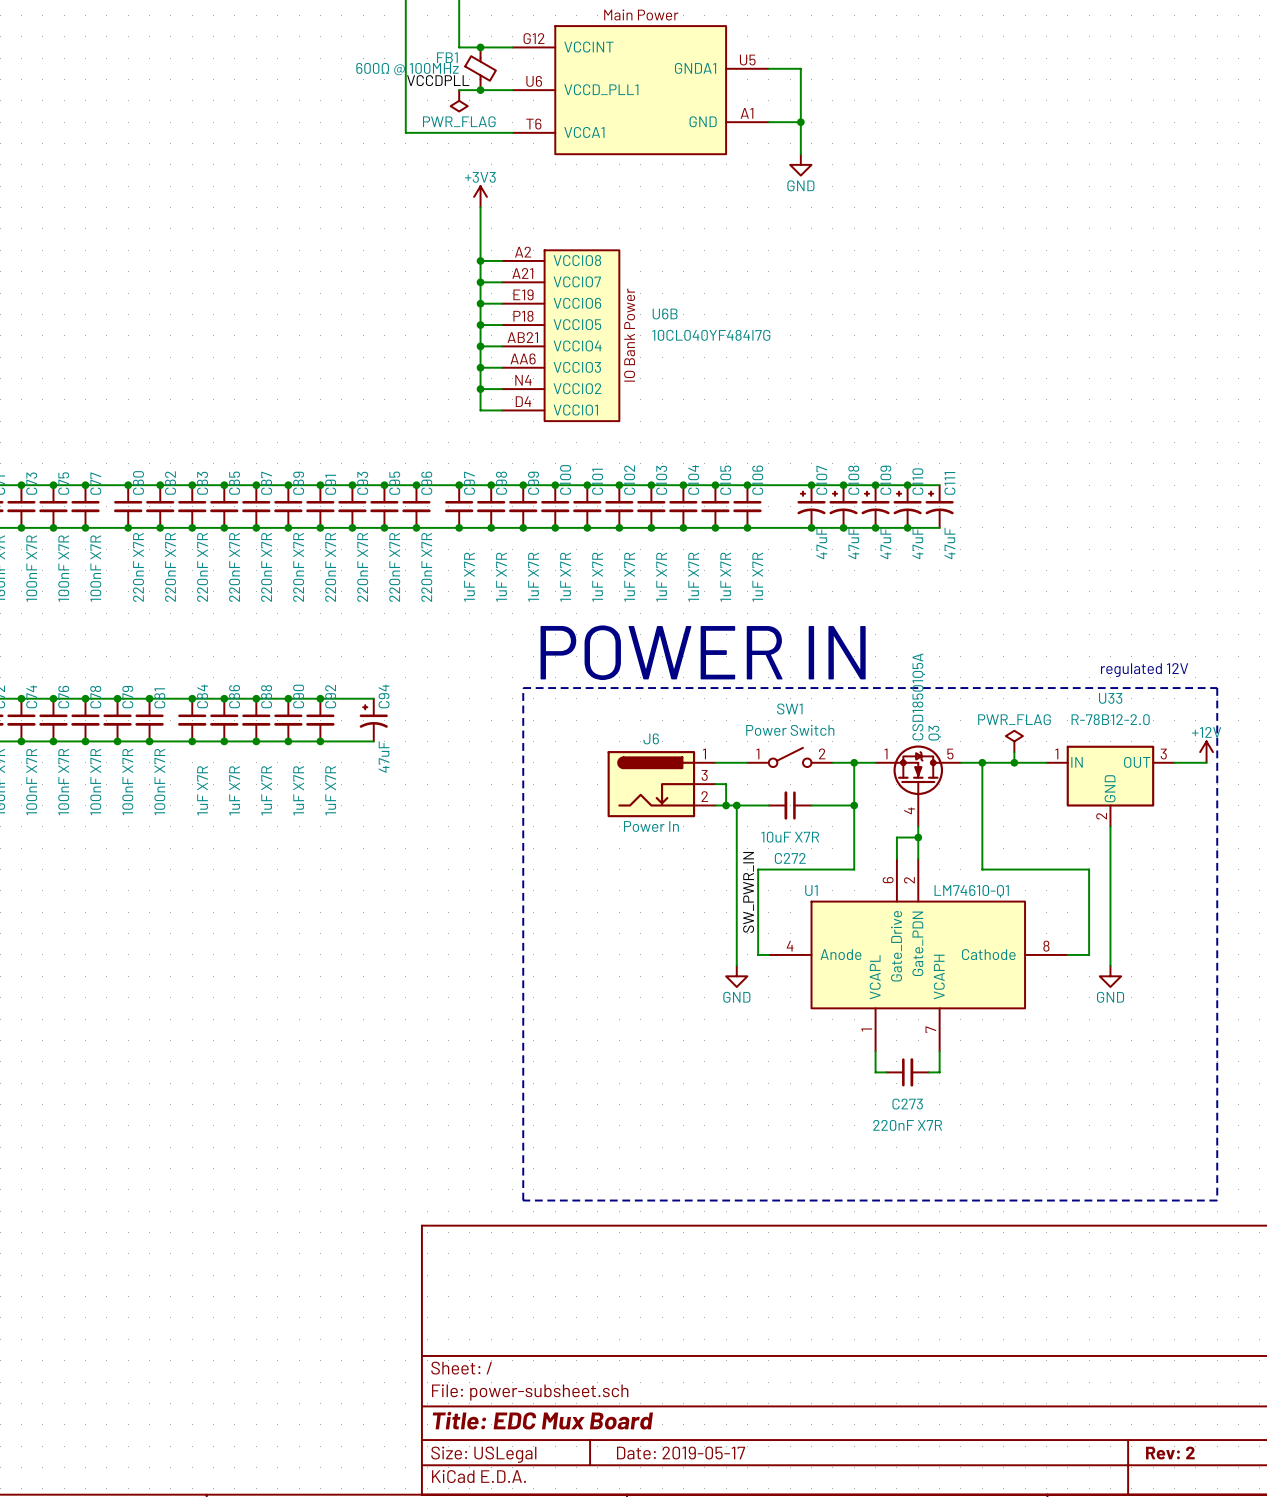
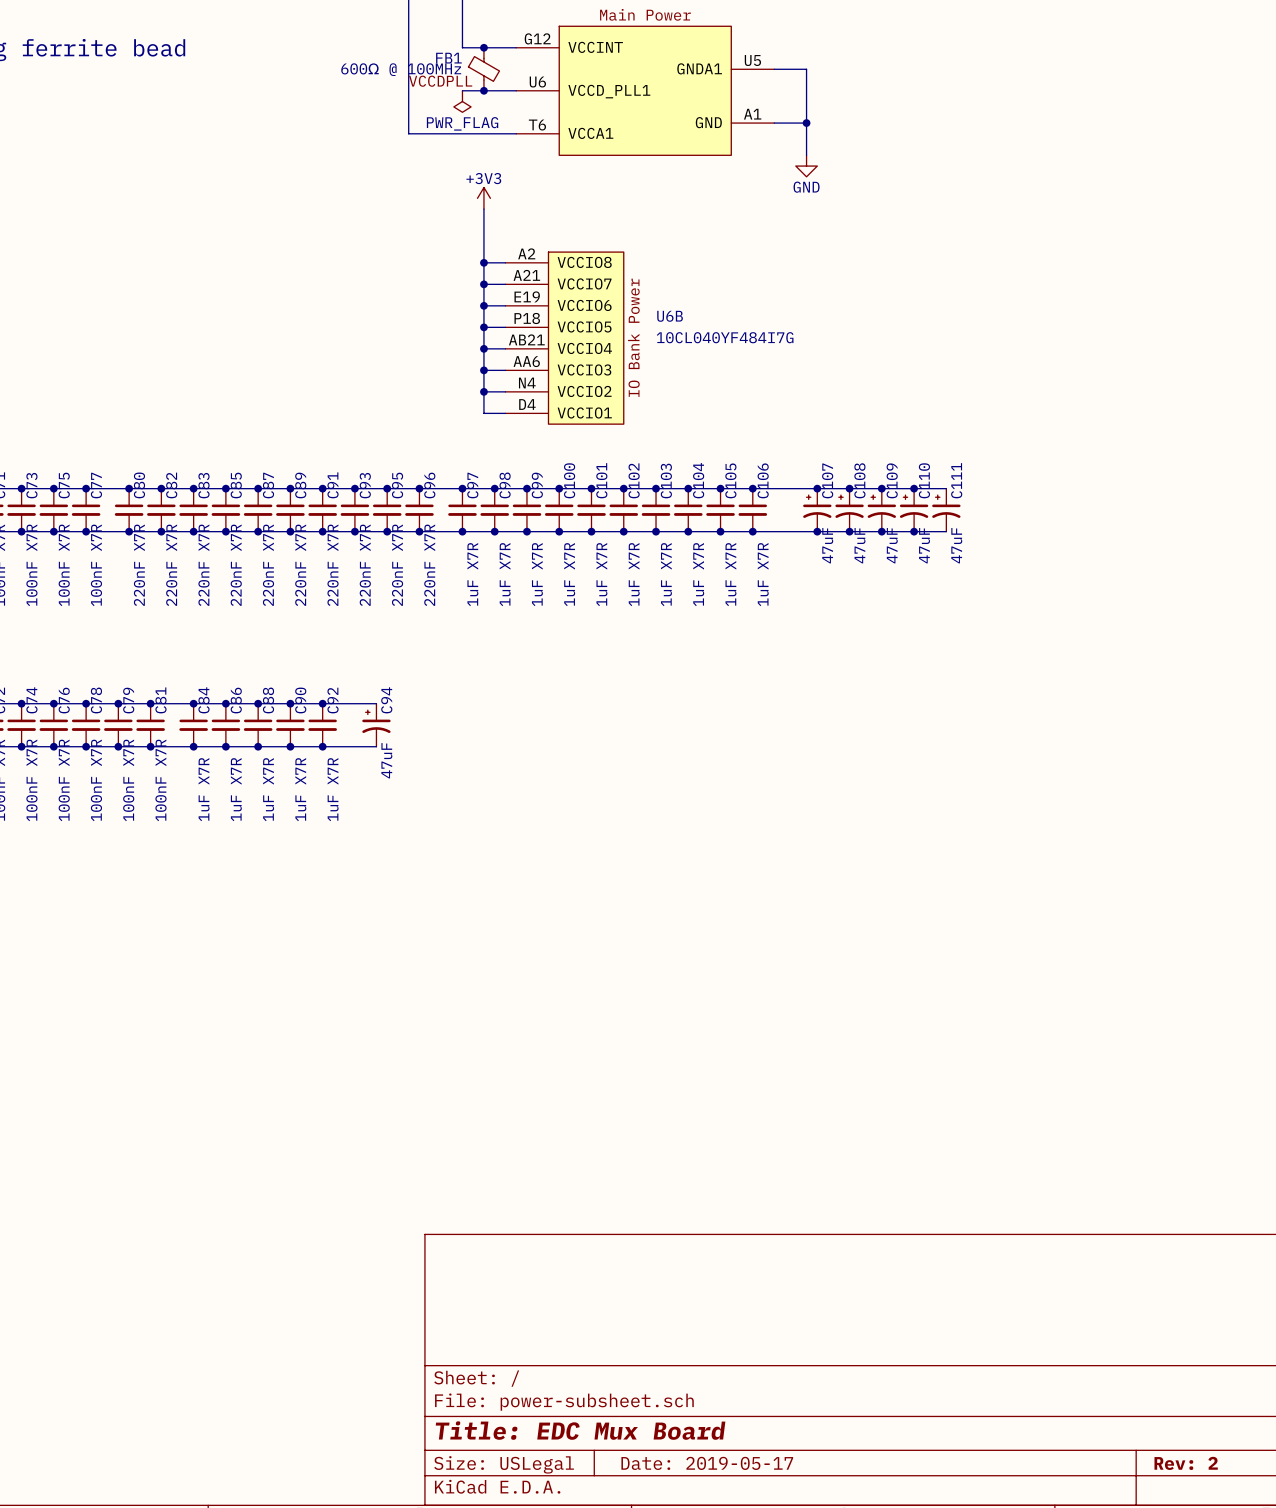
text: POWER IN (703, 652) -> none
text: regulated 12V (1144, 670) -> none
line: (523, 688) (1217, 688) (1217, 1200) (523, 1200) (523, 688) -> none
power symbol: PWR_FLAG (1014, 741) -> none
wire: (1014, 752) (1014, 762) -> none
power symbol: +12V (1206, 752) -> none
SW1: Power Switch (790, 757) -> none
wire: (715, 762) (747, 762) -> none
wire: (832, 762) (875, 762) -> none
wire: (854, 762) (854, 869) (758, 869) (758, 954) (768, 954) -> none
junction: (854, 762) -> none
wire: (960, 762) (1046, 762) -> none
wire: (982, 762) (982, 869) (1089, 869) (1089, 954) (1067, 954) -> none
junction: (982, 762) -> none
junction: (1014, 762) -> none
wire: (1174, 762) (1206, 762) -> none
J6: Power In (661, 784) -> none
wire: (715, 784) (726, 784) (726, 805) -> none
Q3: CSD18501Q5A (918, 786) -> none
U33: R-78B12-2.0 (1110, 786) -> none
wire: (715, 805) (768, 805) -> none
junction: (726, 805) -> none
wire: (736, 805) (736, 965) -> none
junction: (736, 805) -> none
C272: 10uF X7R (790, 805) -> none
wire: (811, 805) (854, 805) -> none
junction: (854, 805) -> none
wire: (918, 826) (918, 858) -> none
wire: (1110, 826) (1110, 965) -> none
wire: (918, 837) (896, 837) (896, 858) -> none
junction: (918, 837) -> none
label: SW_PWR_IN (748, 892) -> none
U1: LM74610-Q1 (918, 954) -> none
power symbol: GND (736, 976) -> none
power symbol: GND (1110, 976) -> none
wire: (875, 1051) (875, 1072) (886, 1072) -> none
wire: (939, 1051) (939, 1072) (928, 1072) -> none
C273: 220nF X7R (907, 1072) -> none

